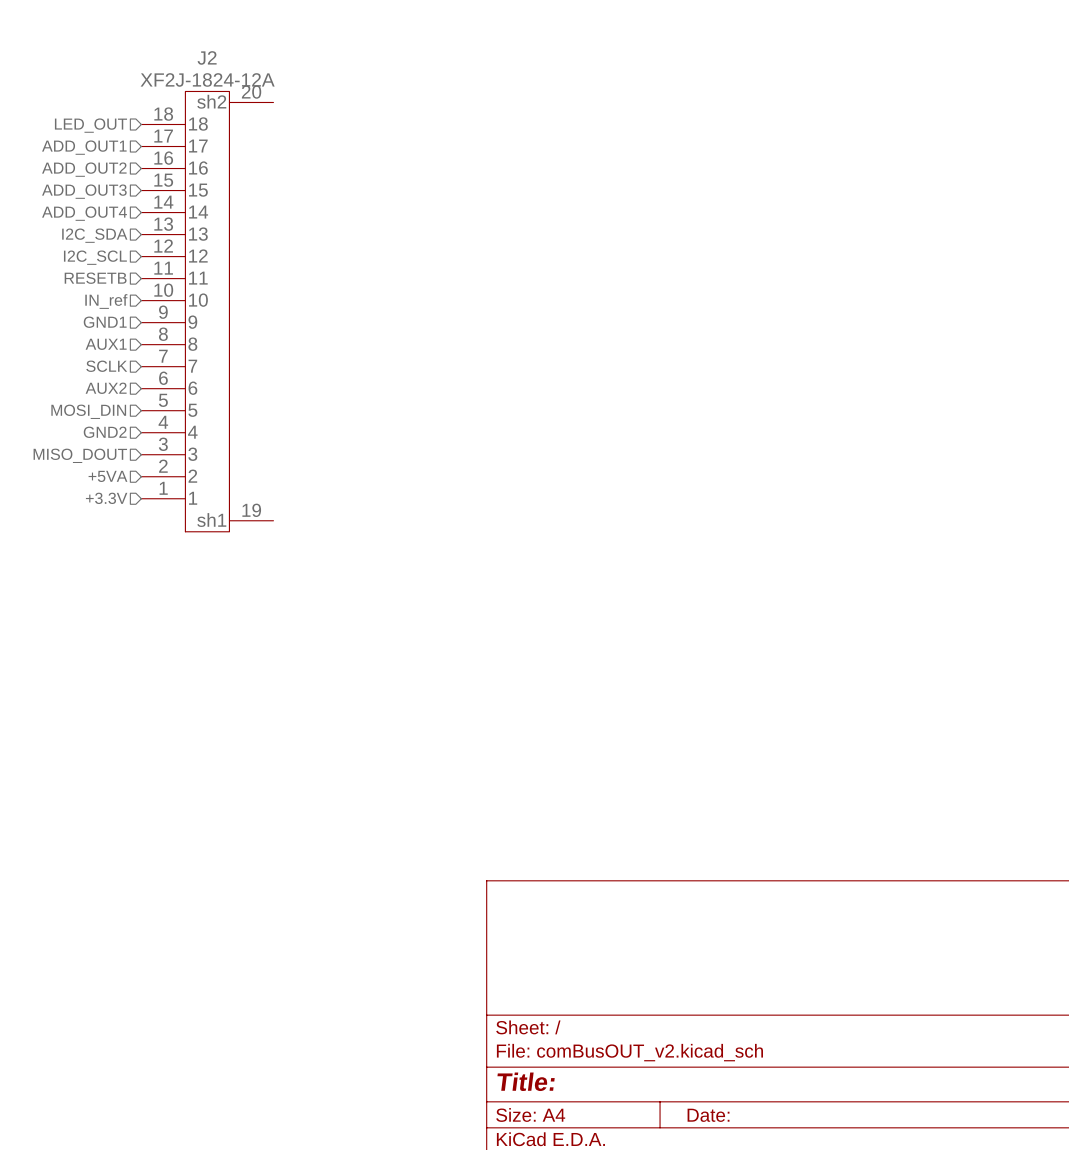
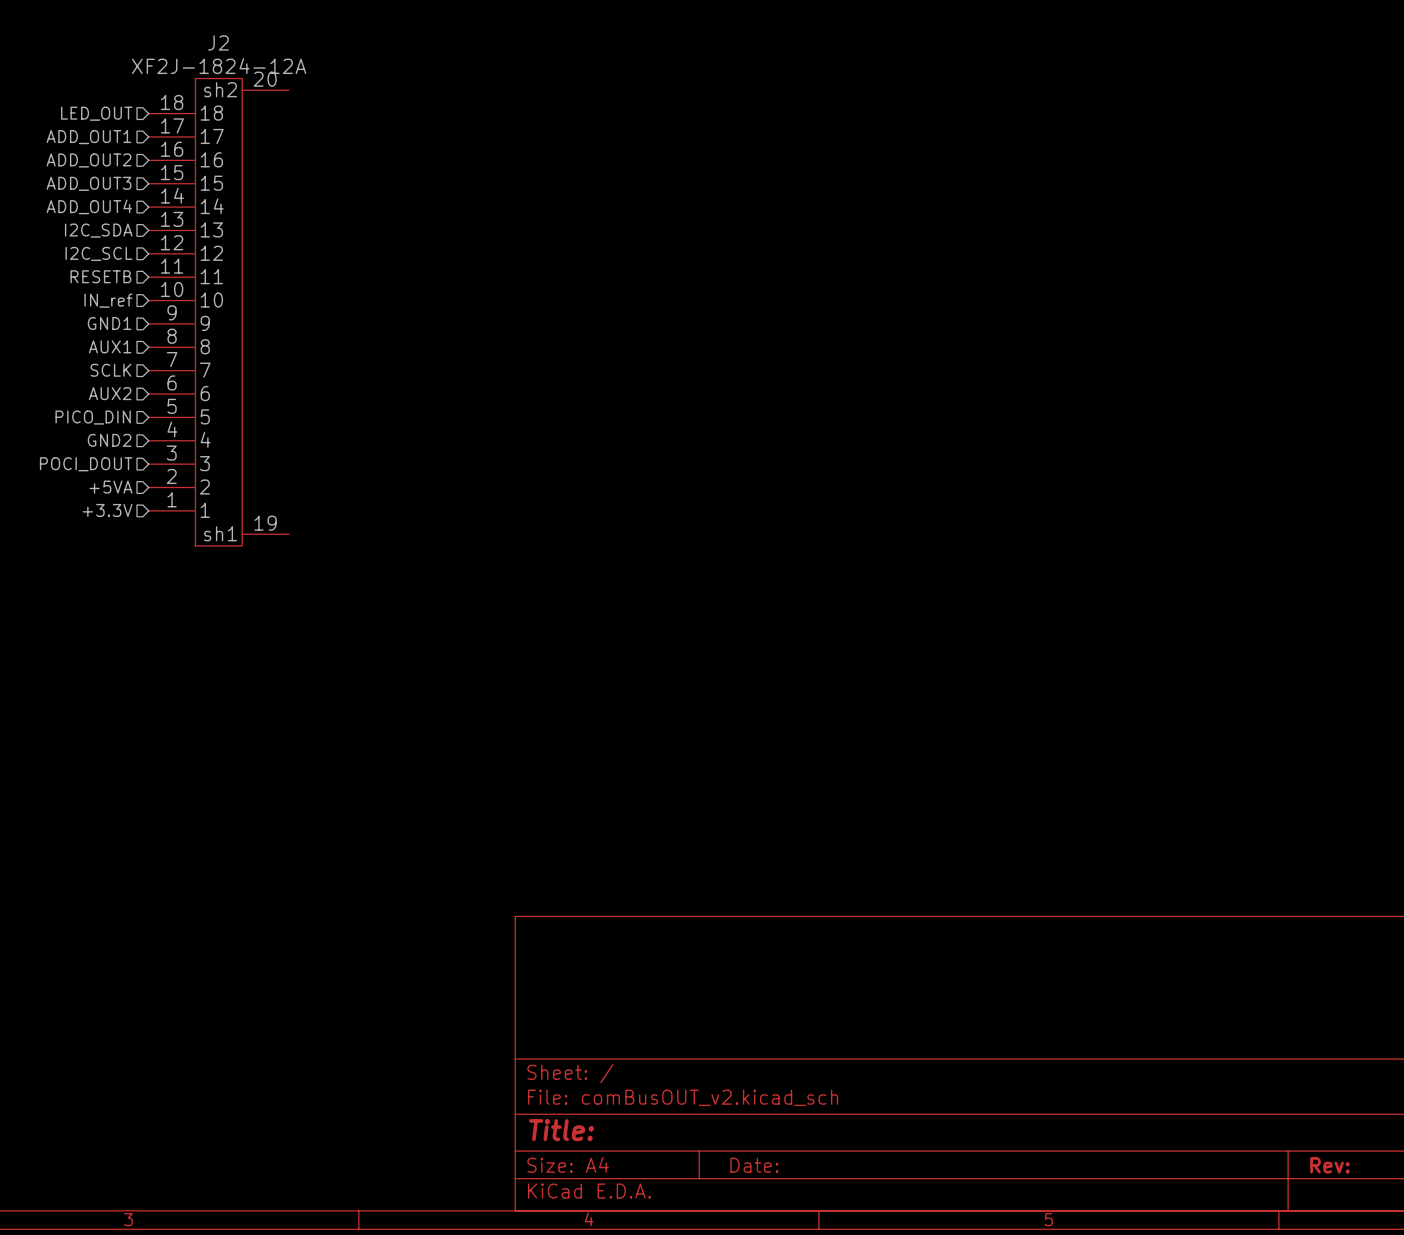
hierarchical label: MOSI_DIN (88, 411) -> PICO_DIN (93, 417)
hierarchical label: MISO_DOUT (80, 455) -> POCI_DOUT (86, 464)

